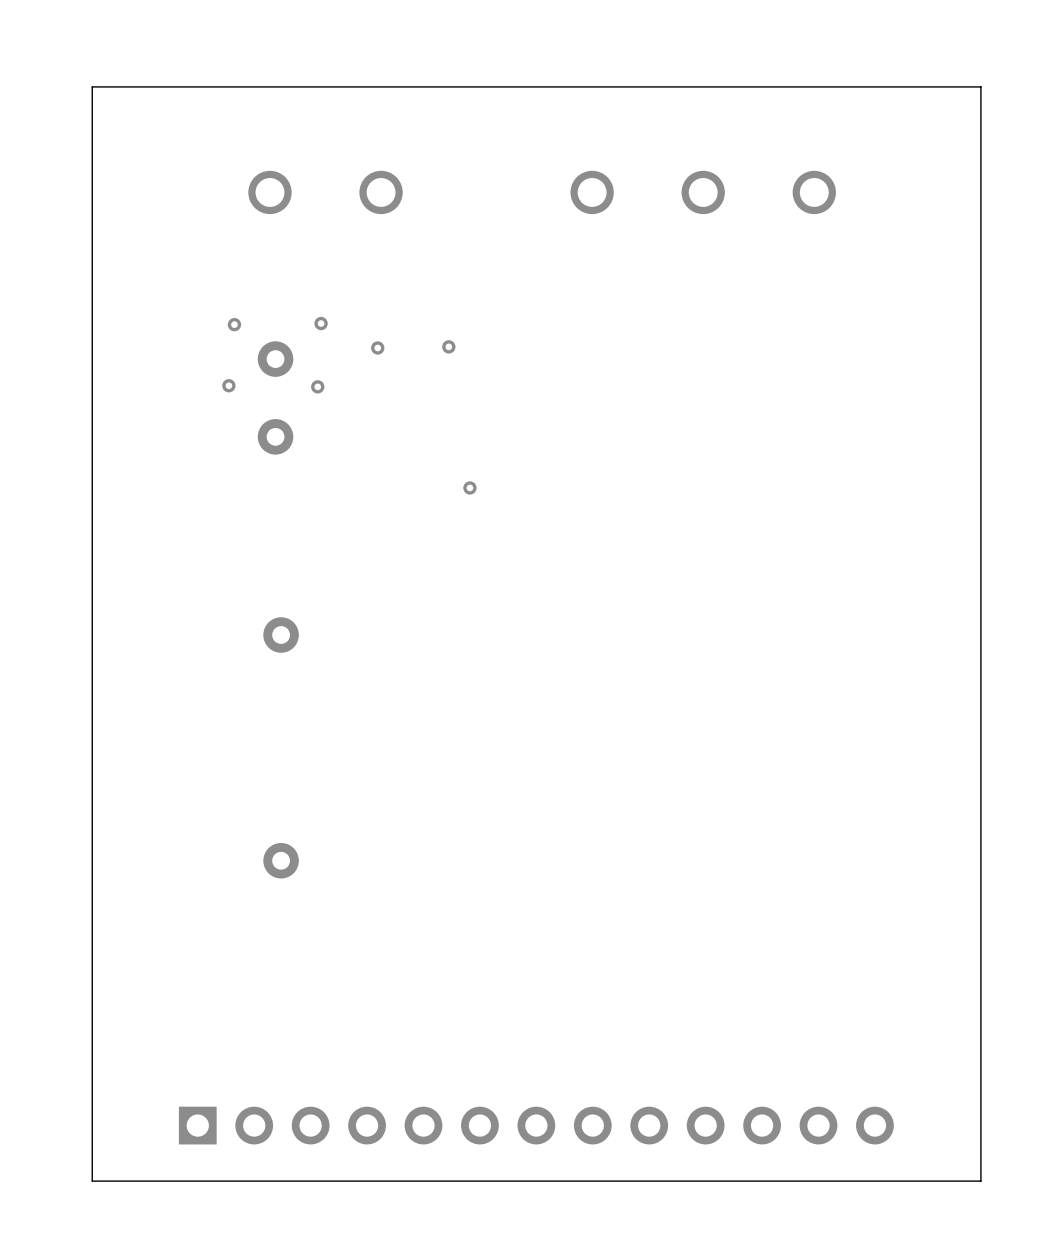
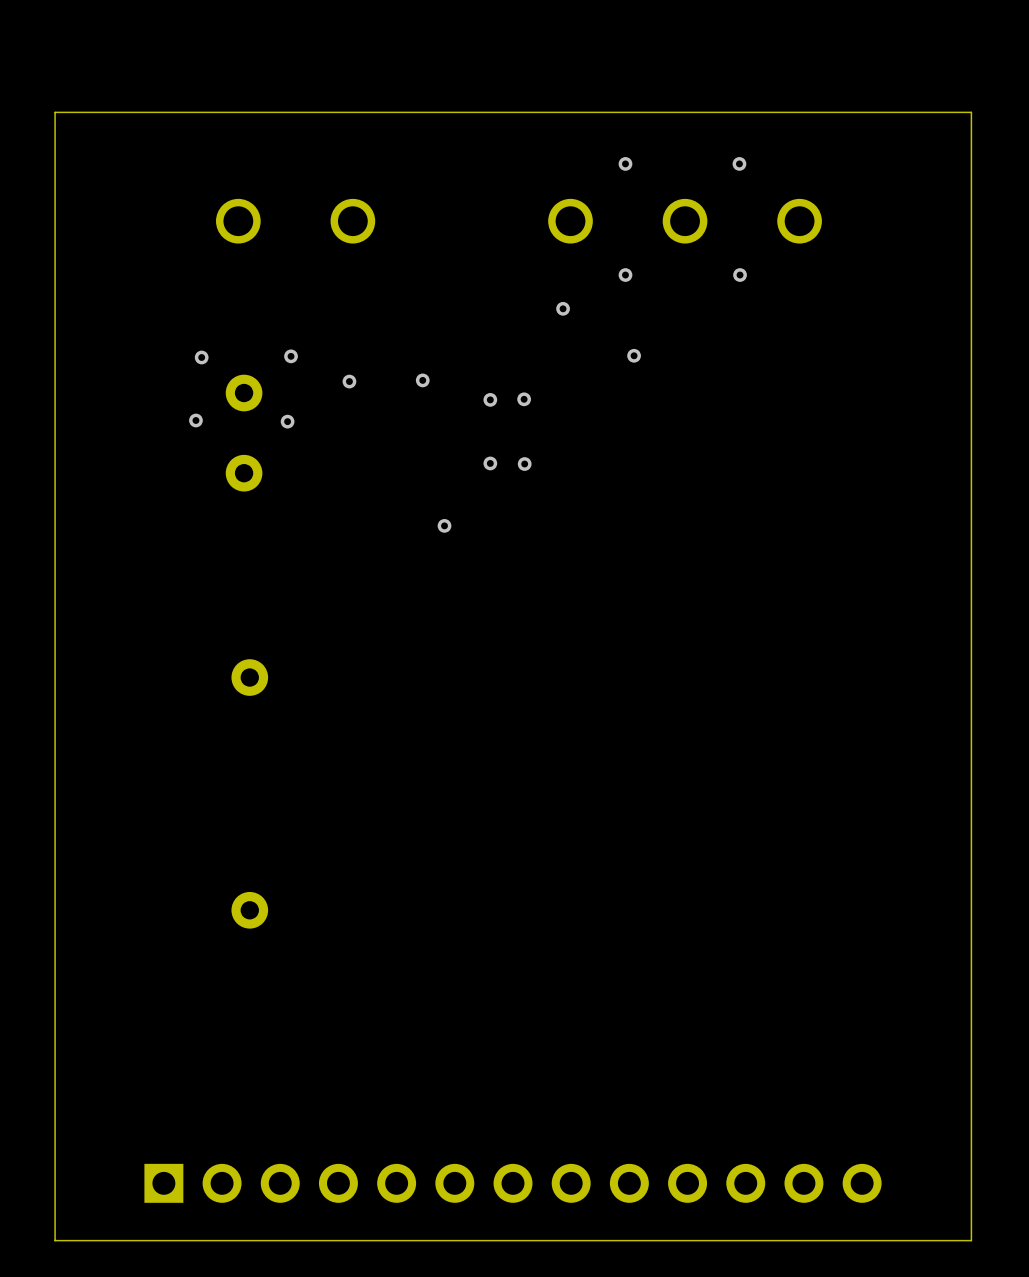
via: none -> (625, 163)
via: none -> (739, 163)
via: none -> (625, 275)
via: none -> (740, 275)
via: none -> (563, 308)
via: none -> (634, 355)
via: none -> (490, 399)
via: none -> (524, 399)
via: none -> (490, 463)
via: none -> (524, 464)

